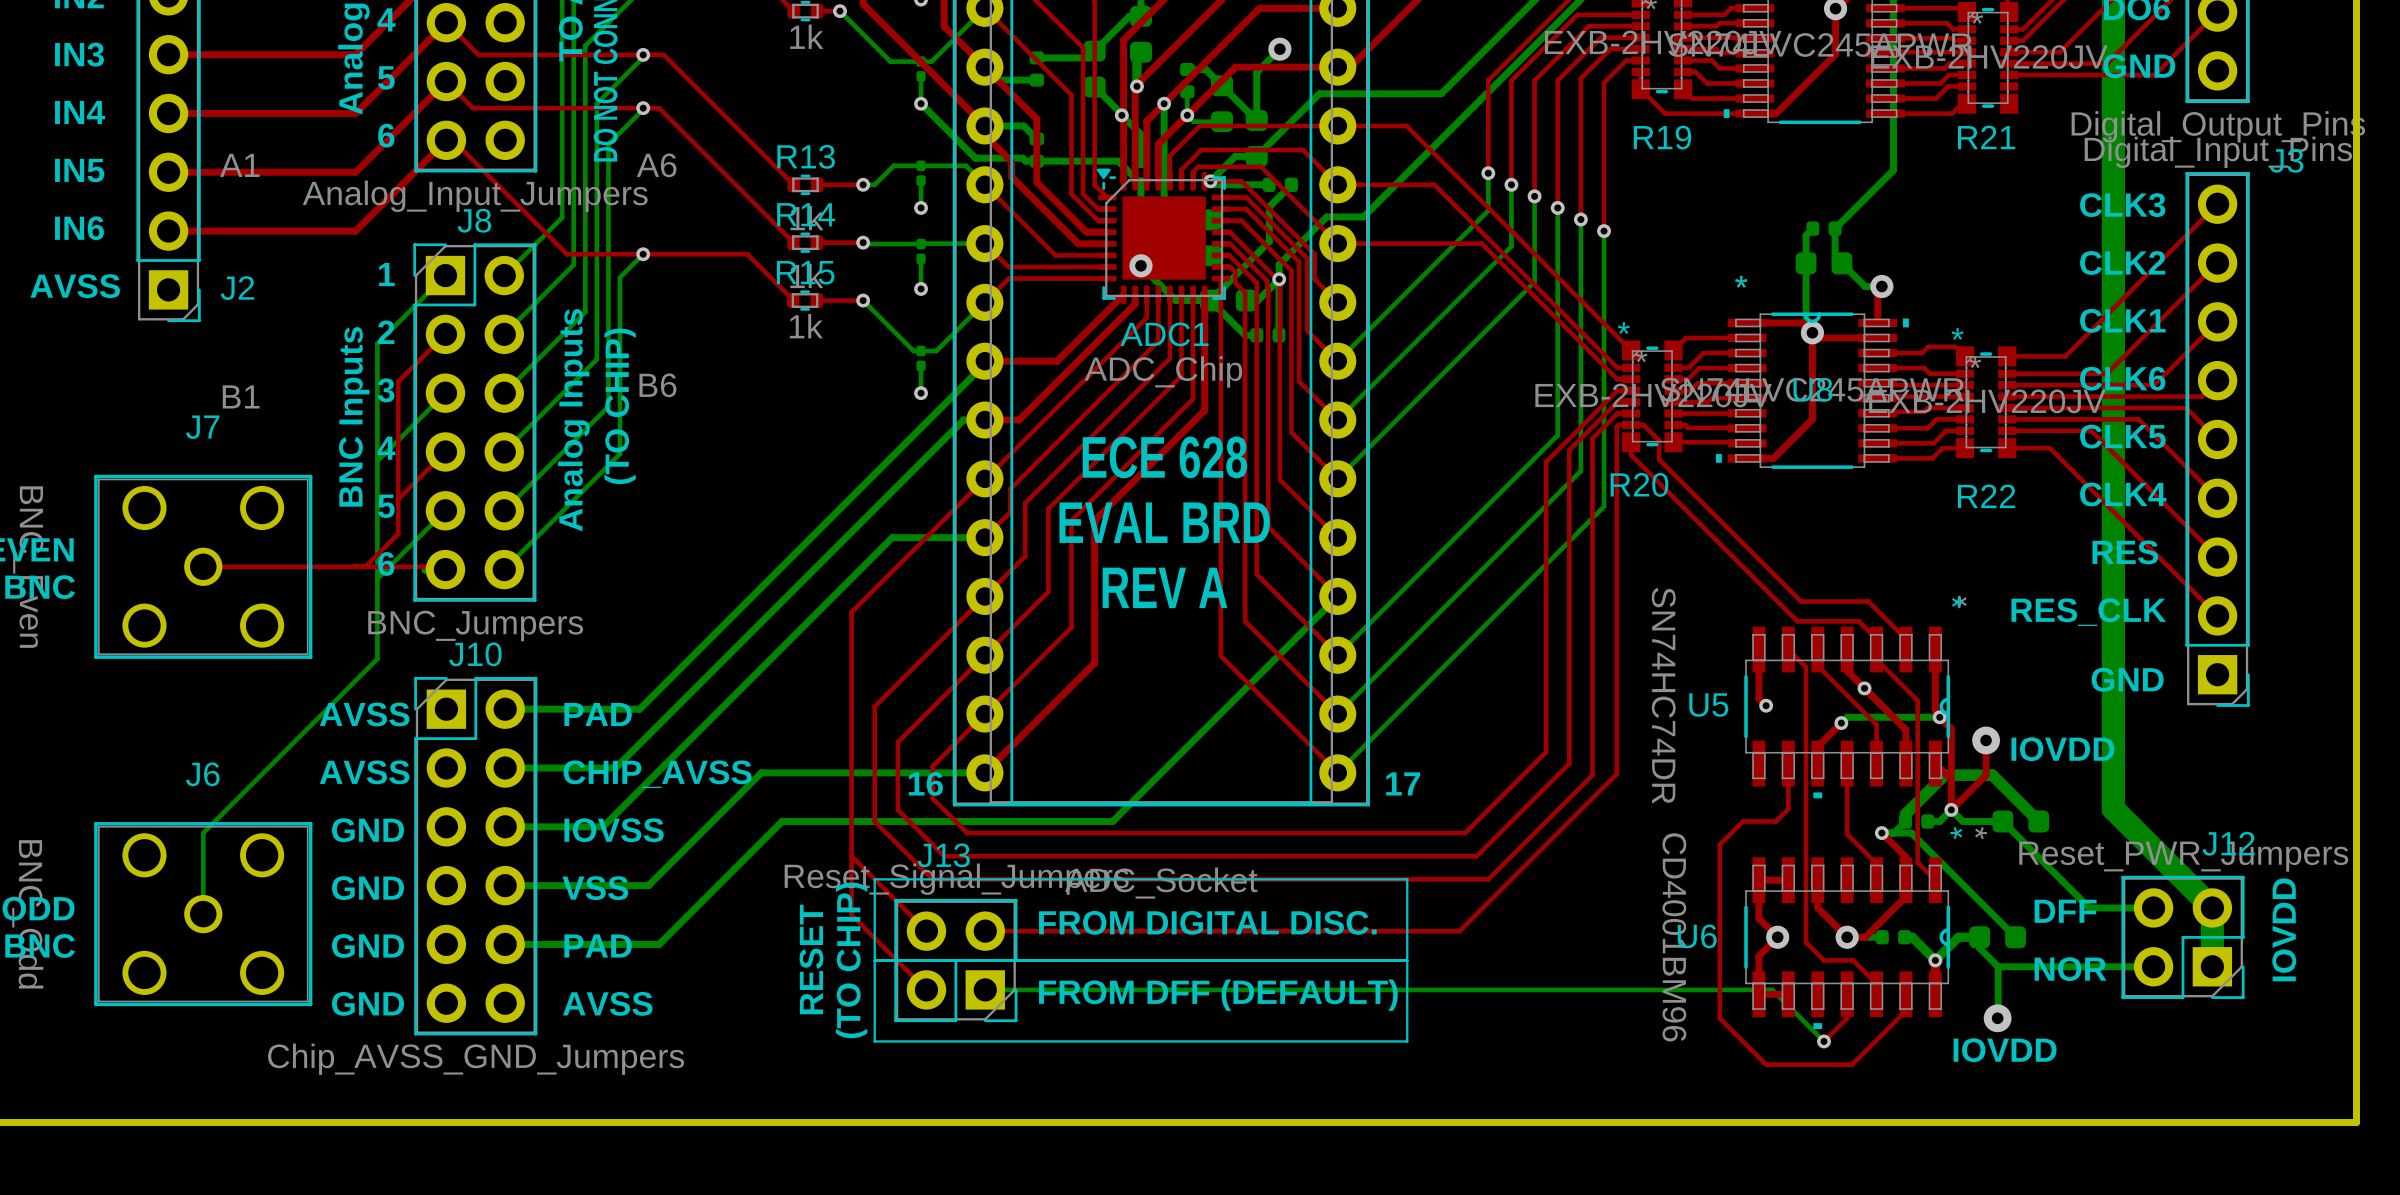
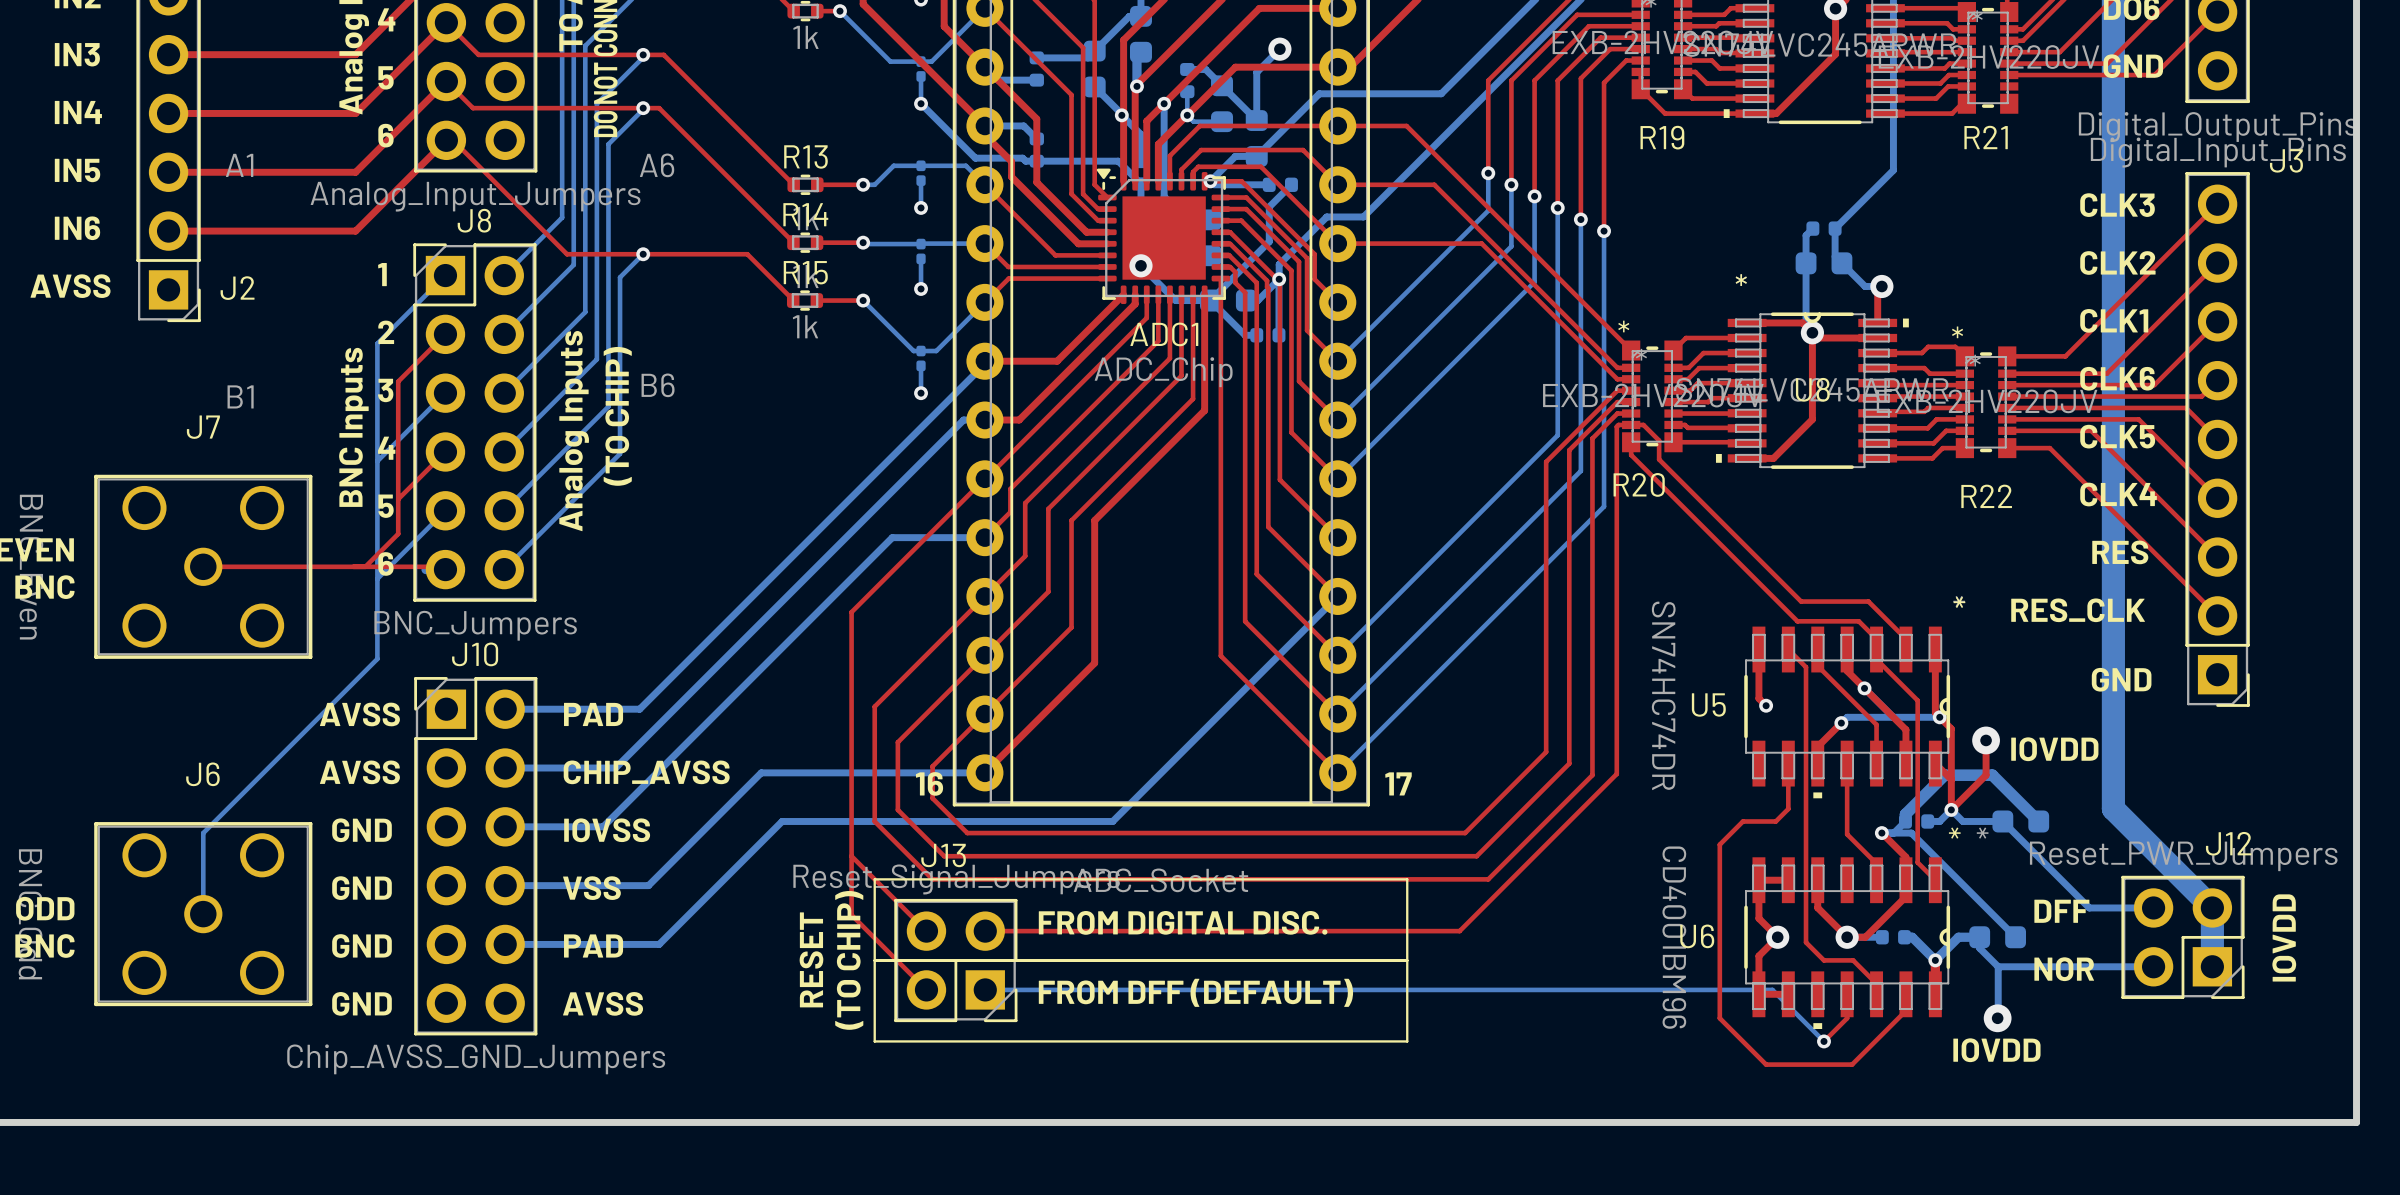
text: ECE 628 (1164, 457) -> none
text: EVAL BRD (1164, 522) -> none
text: REV A (1164, 587) -> none

